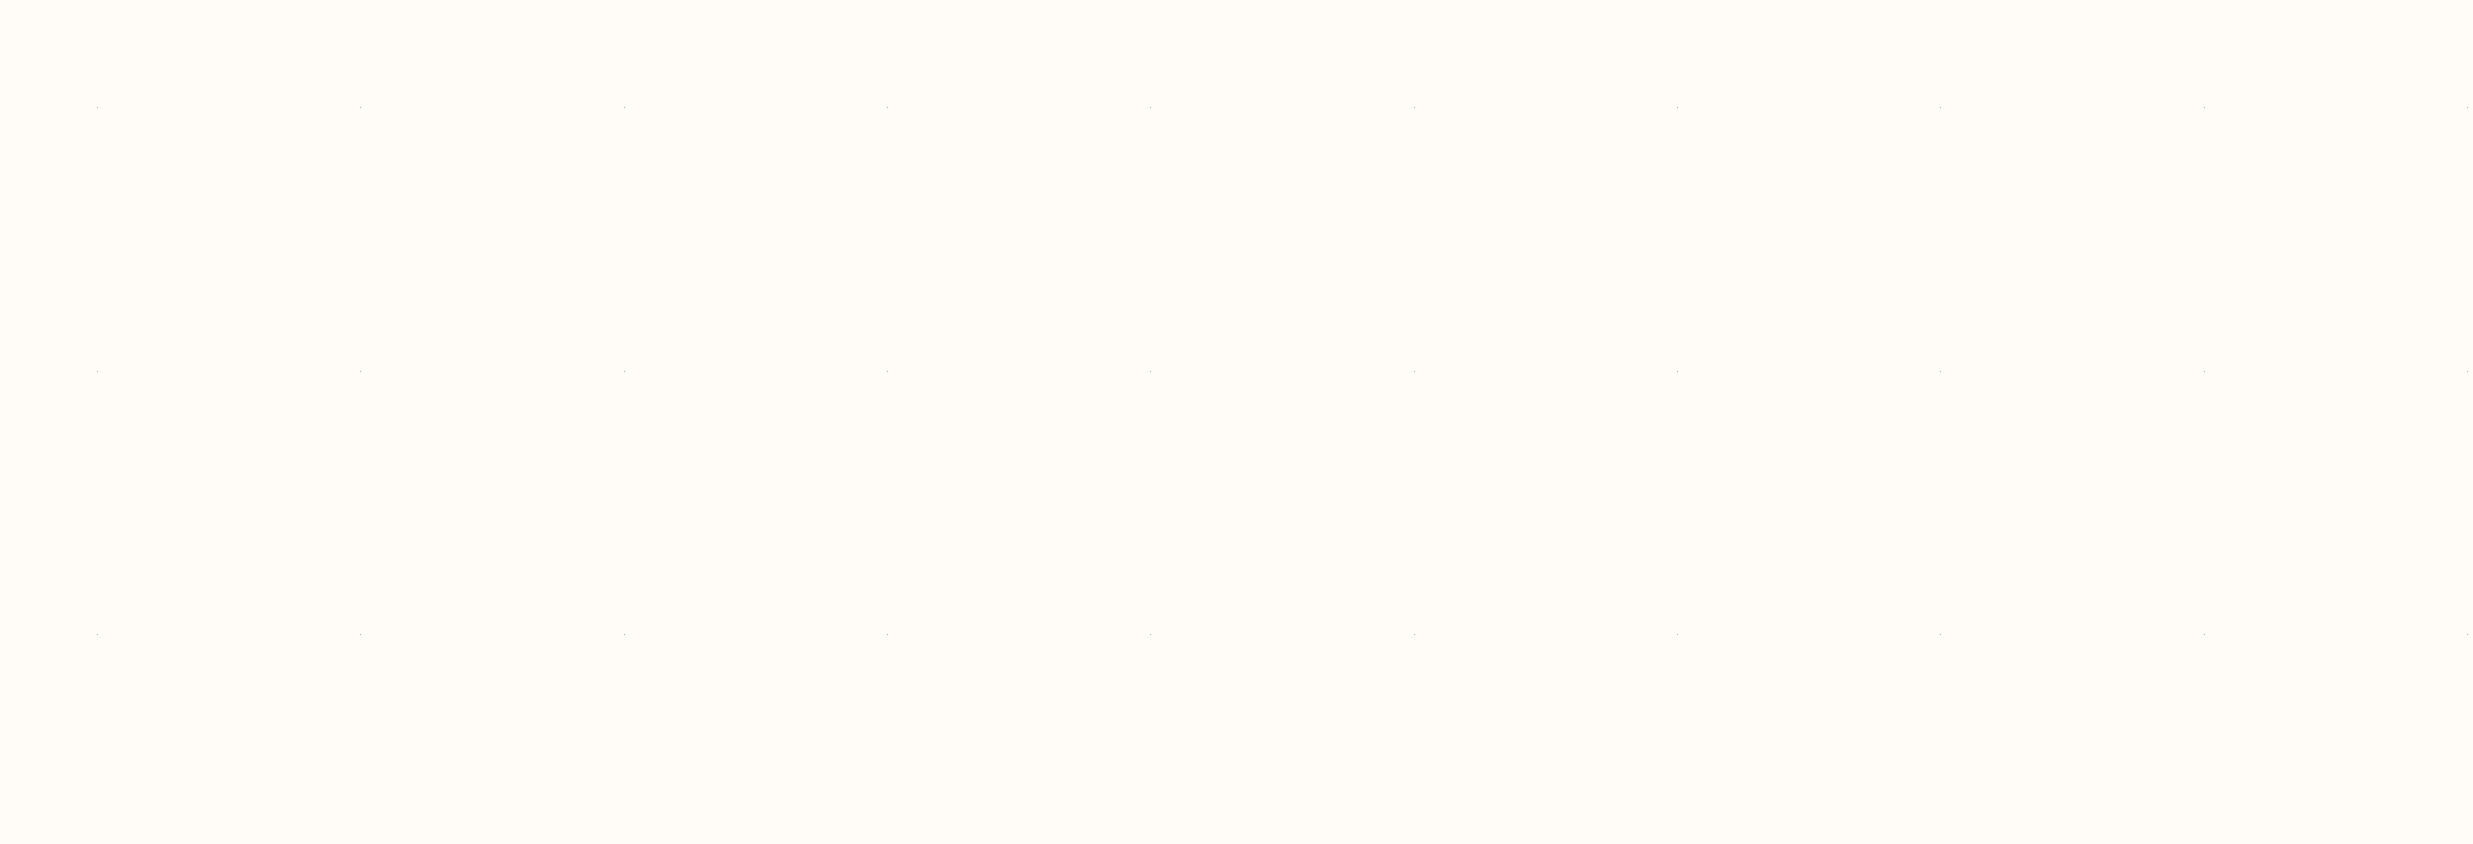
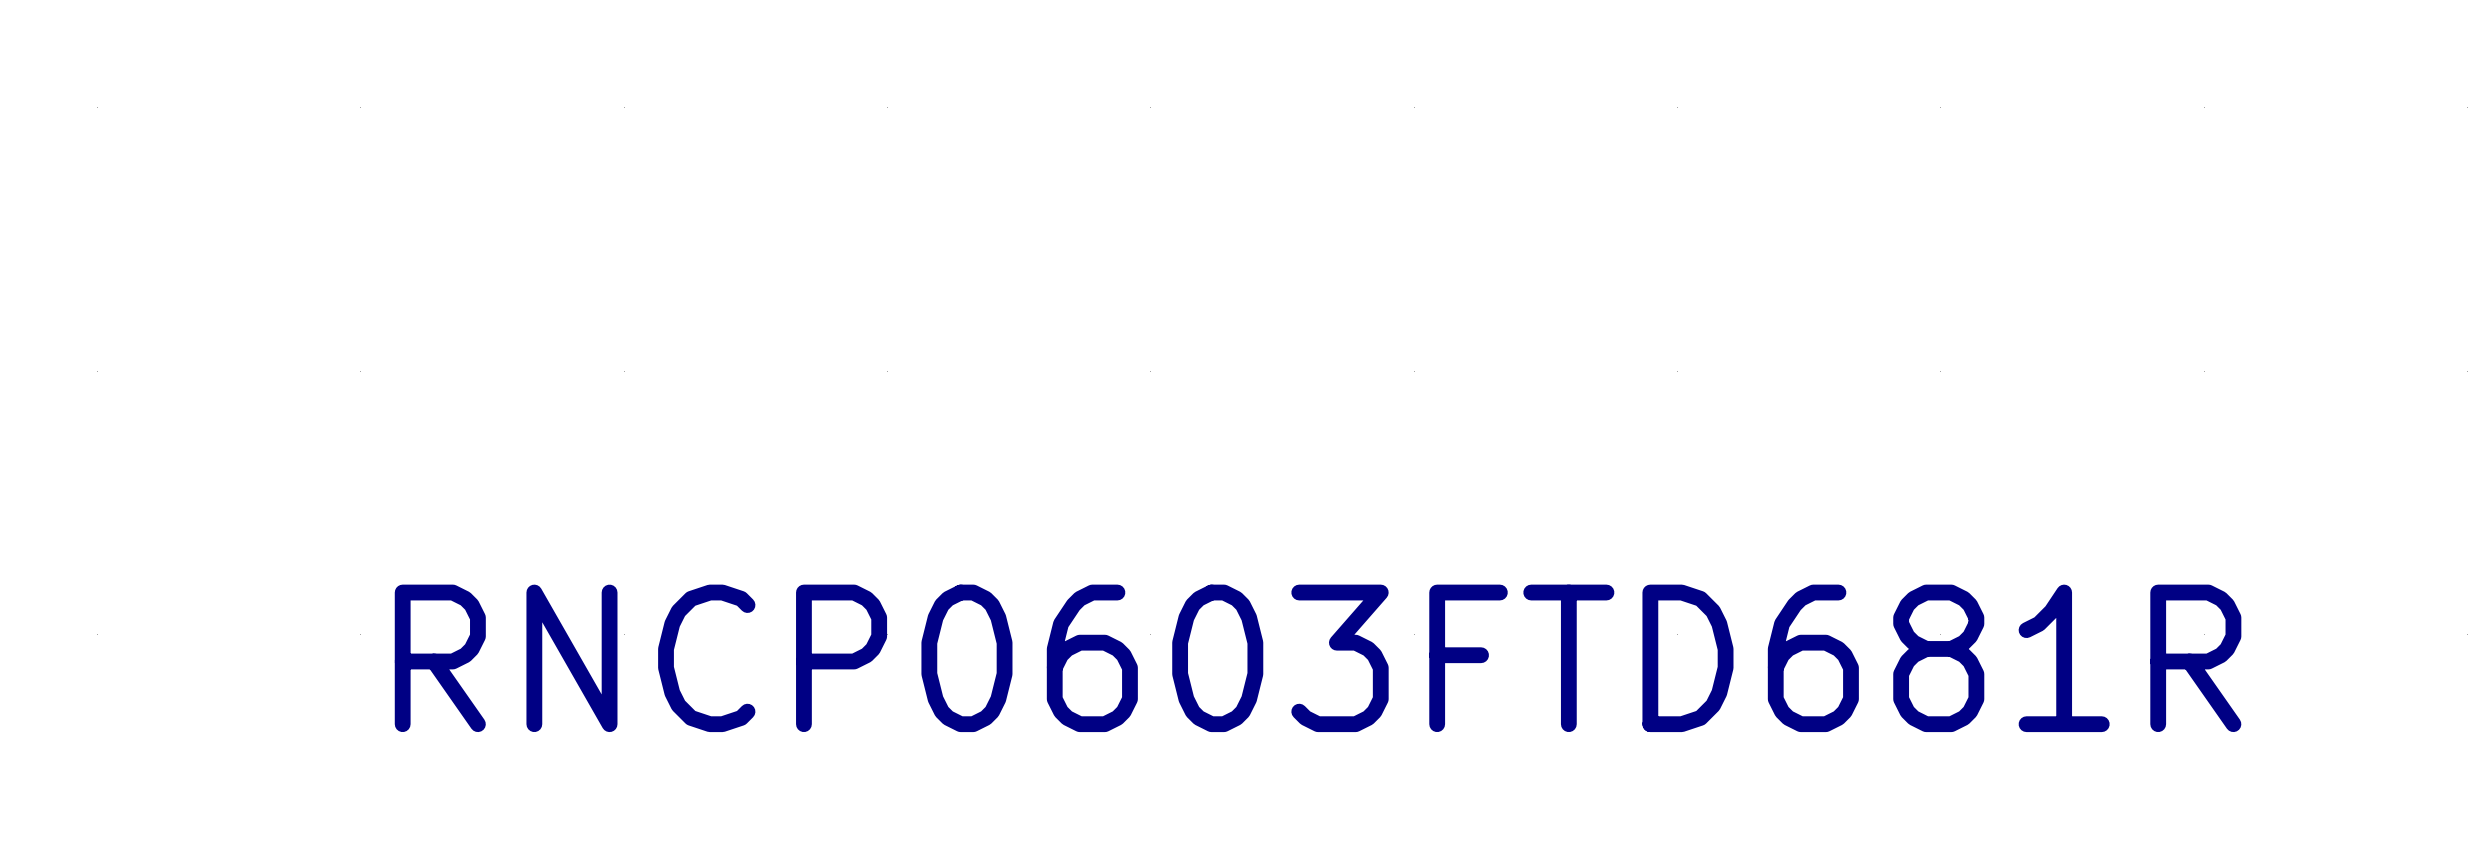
text: none -> RNCP0603FTD681R (1318, 658)

